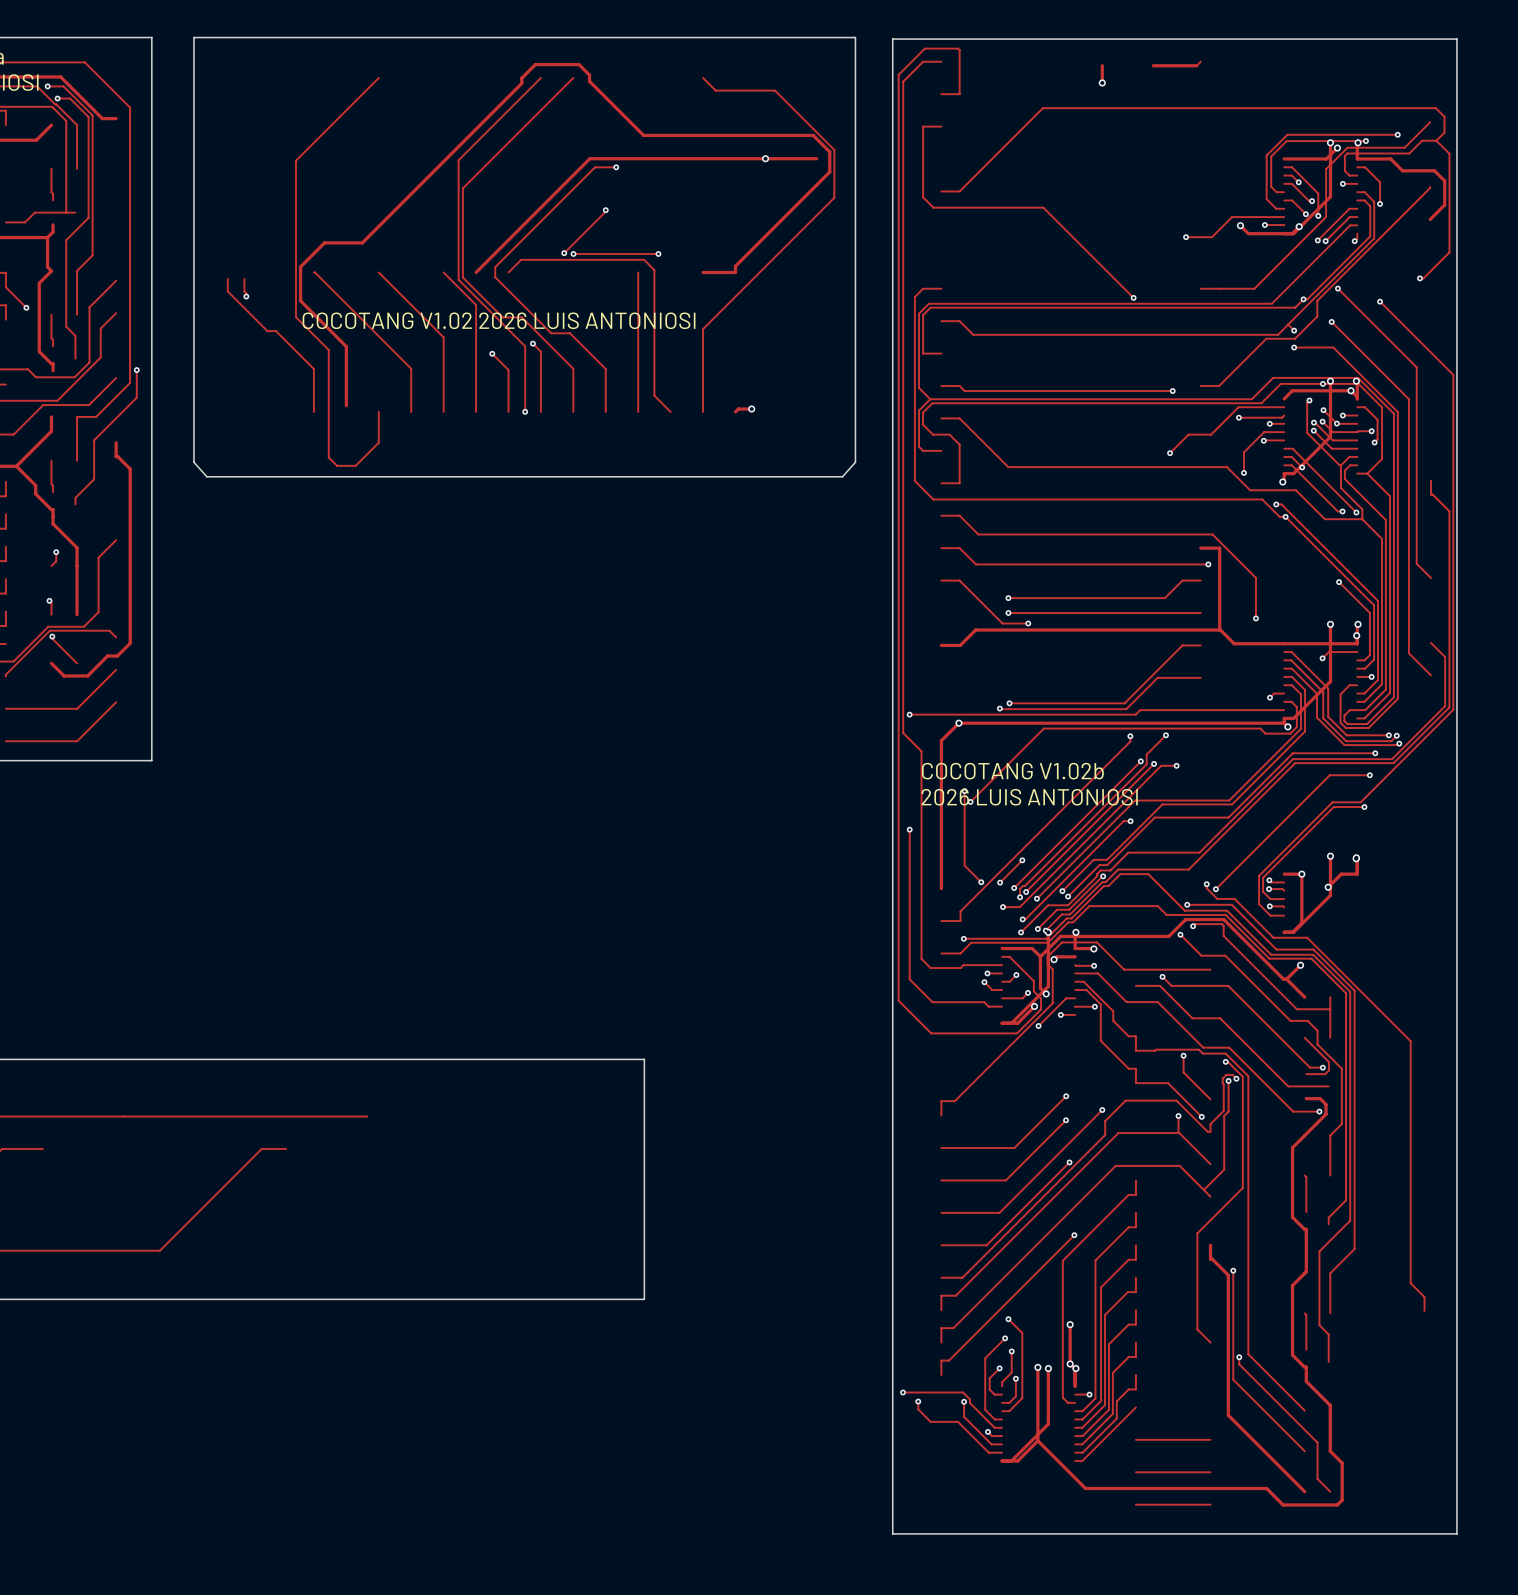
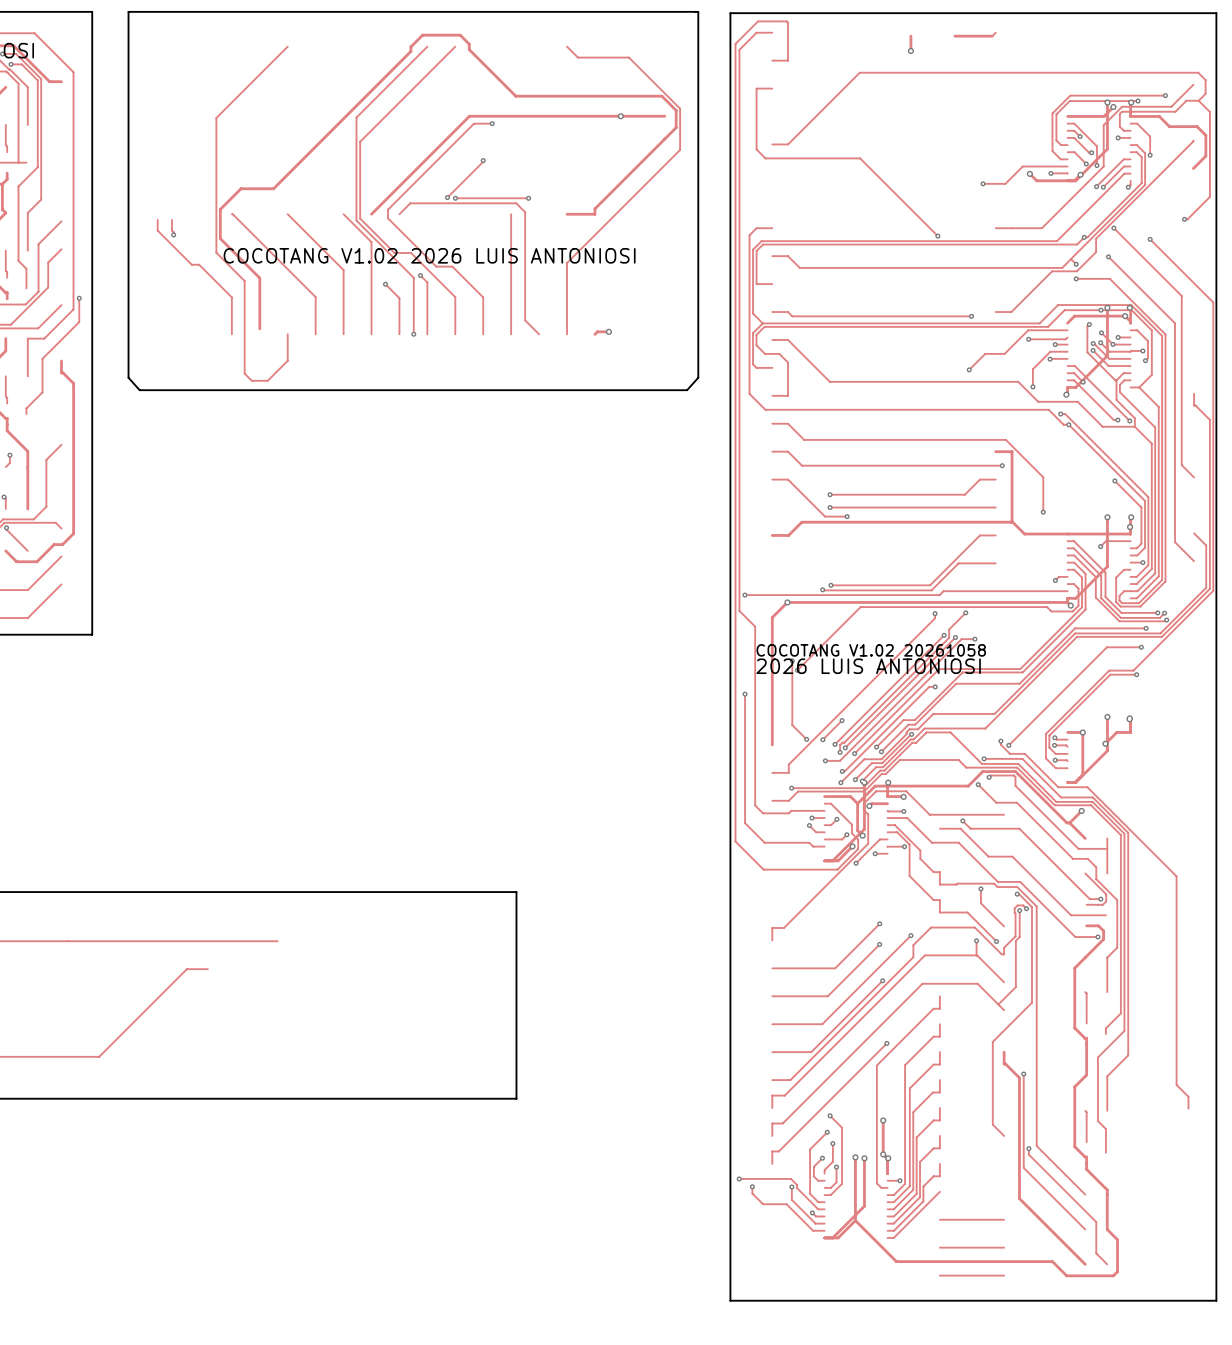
text: COCOTANG V1.02b (1012, 771) -> COCOTANG V1.02 20261058 (871, 650)

